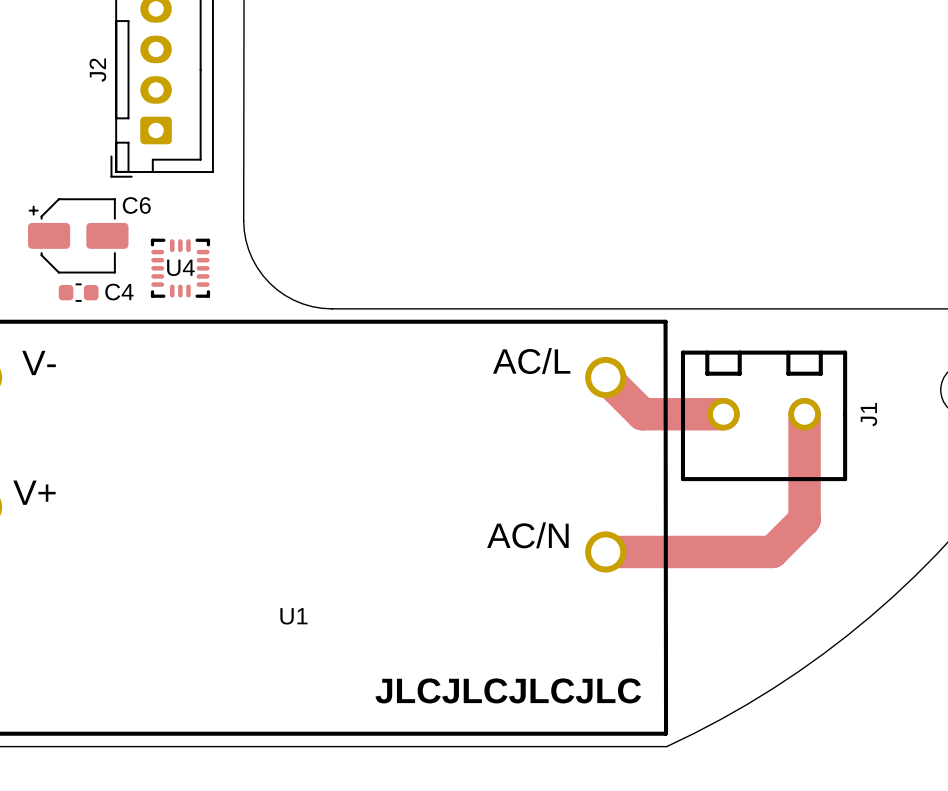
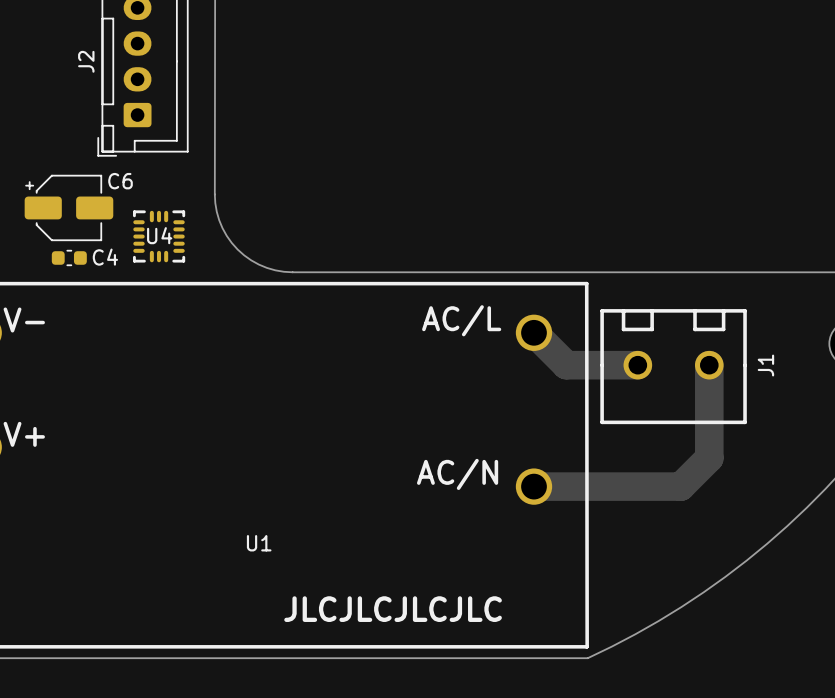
text position: JLCJLCJLCJLC (508, 690) -> JLCJLCJLCJLC (393, 609)

